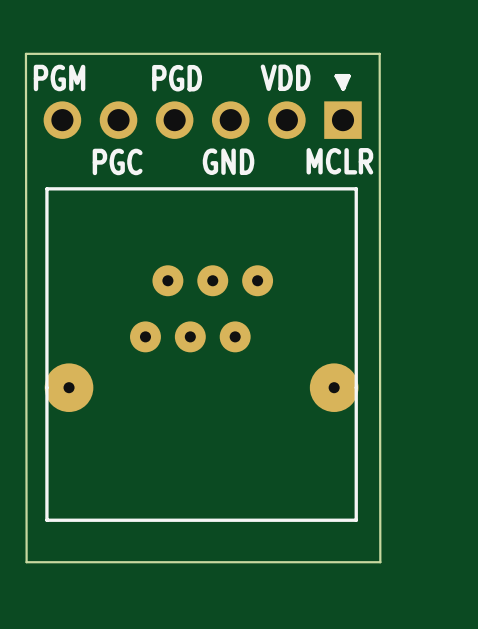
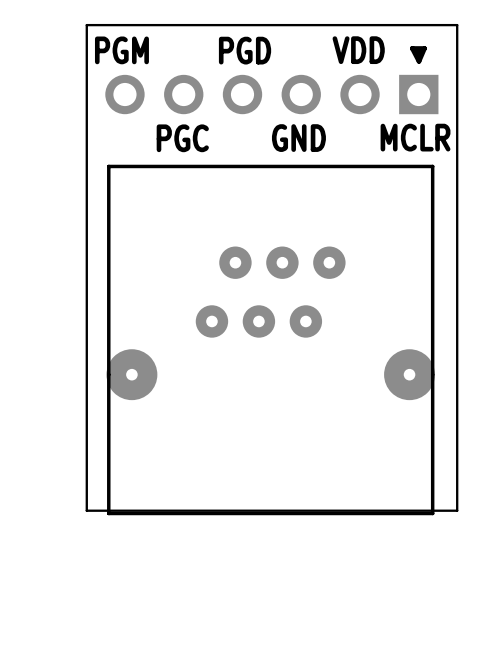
board edge: (25, 53) (26, 562) (380, 562) (379, 53) -> (86, 25) (86, 510) (457, 510) (457, 25)

